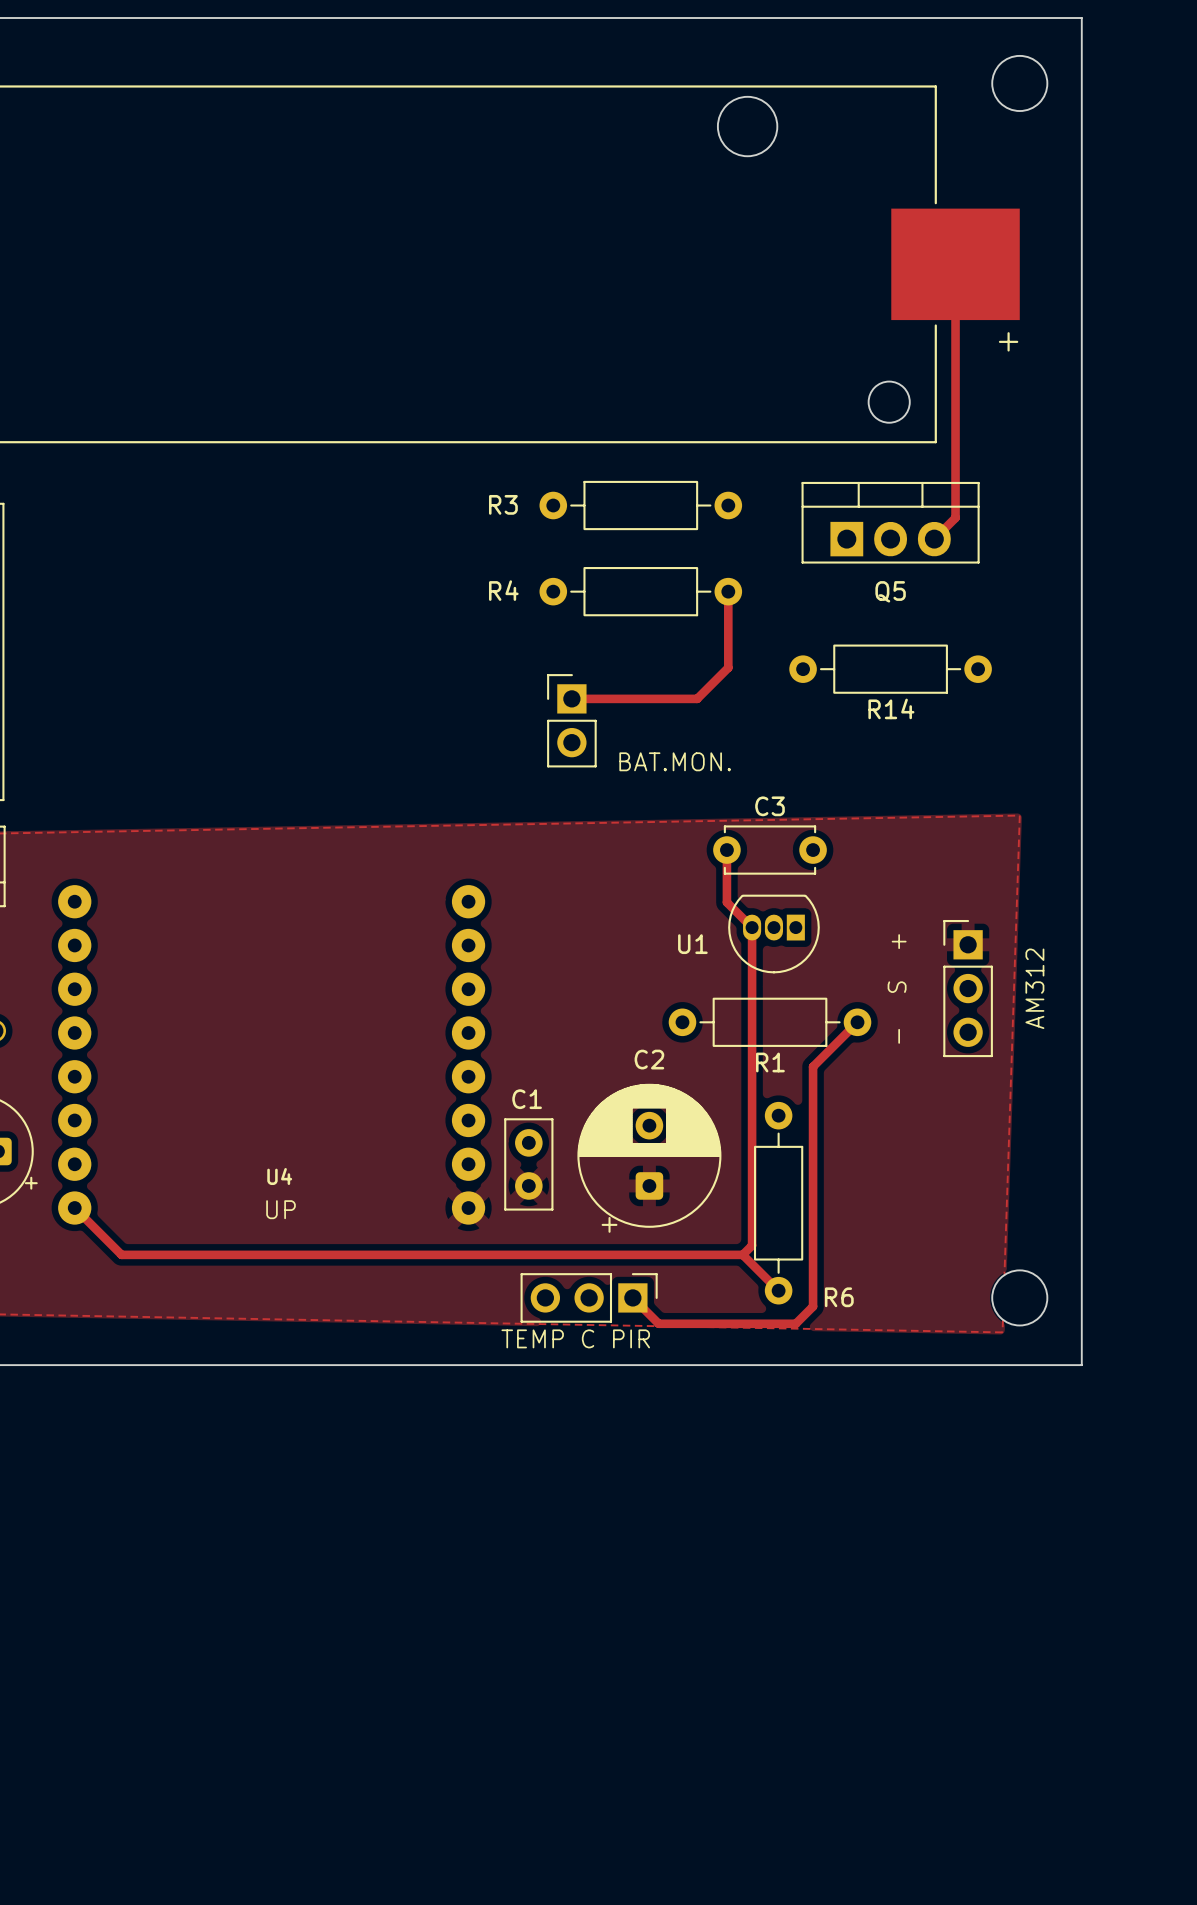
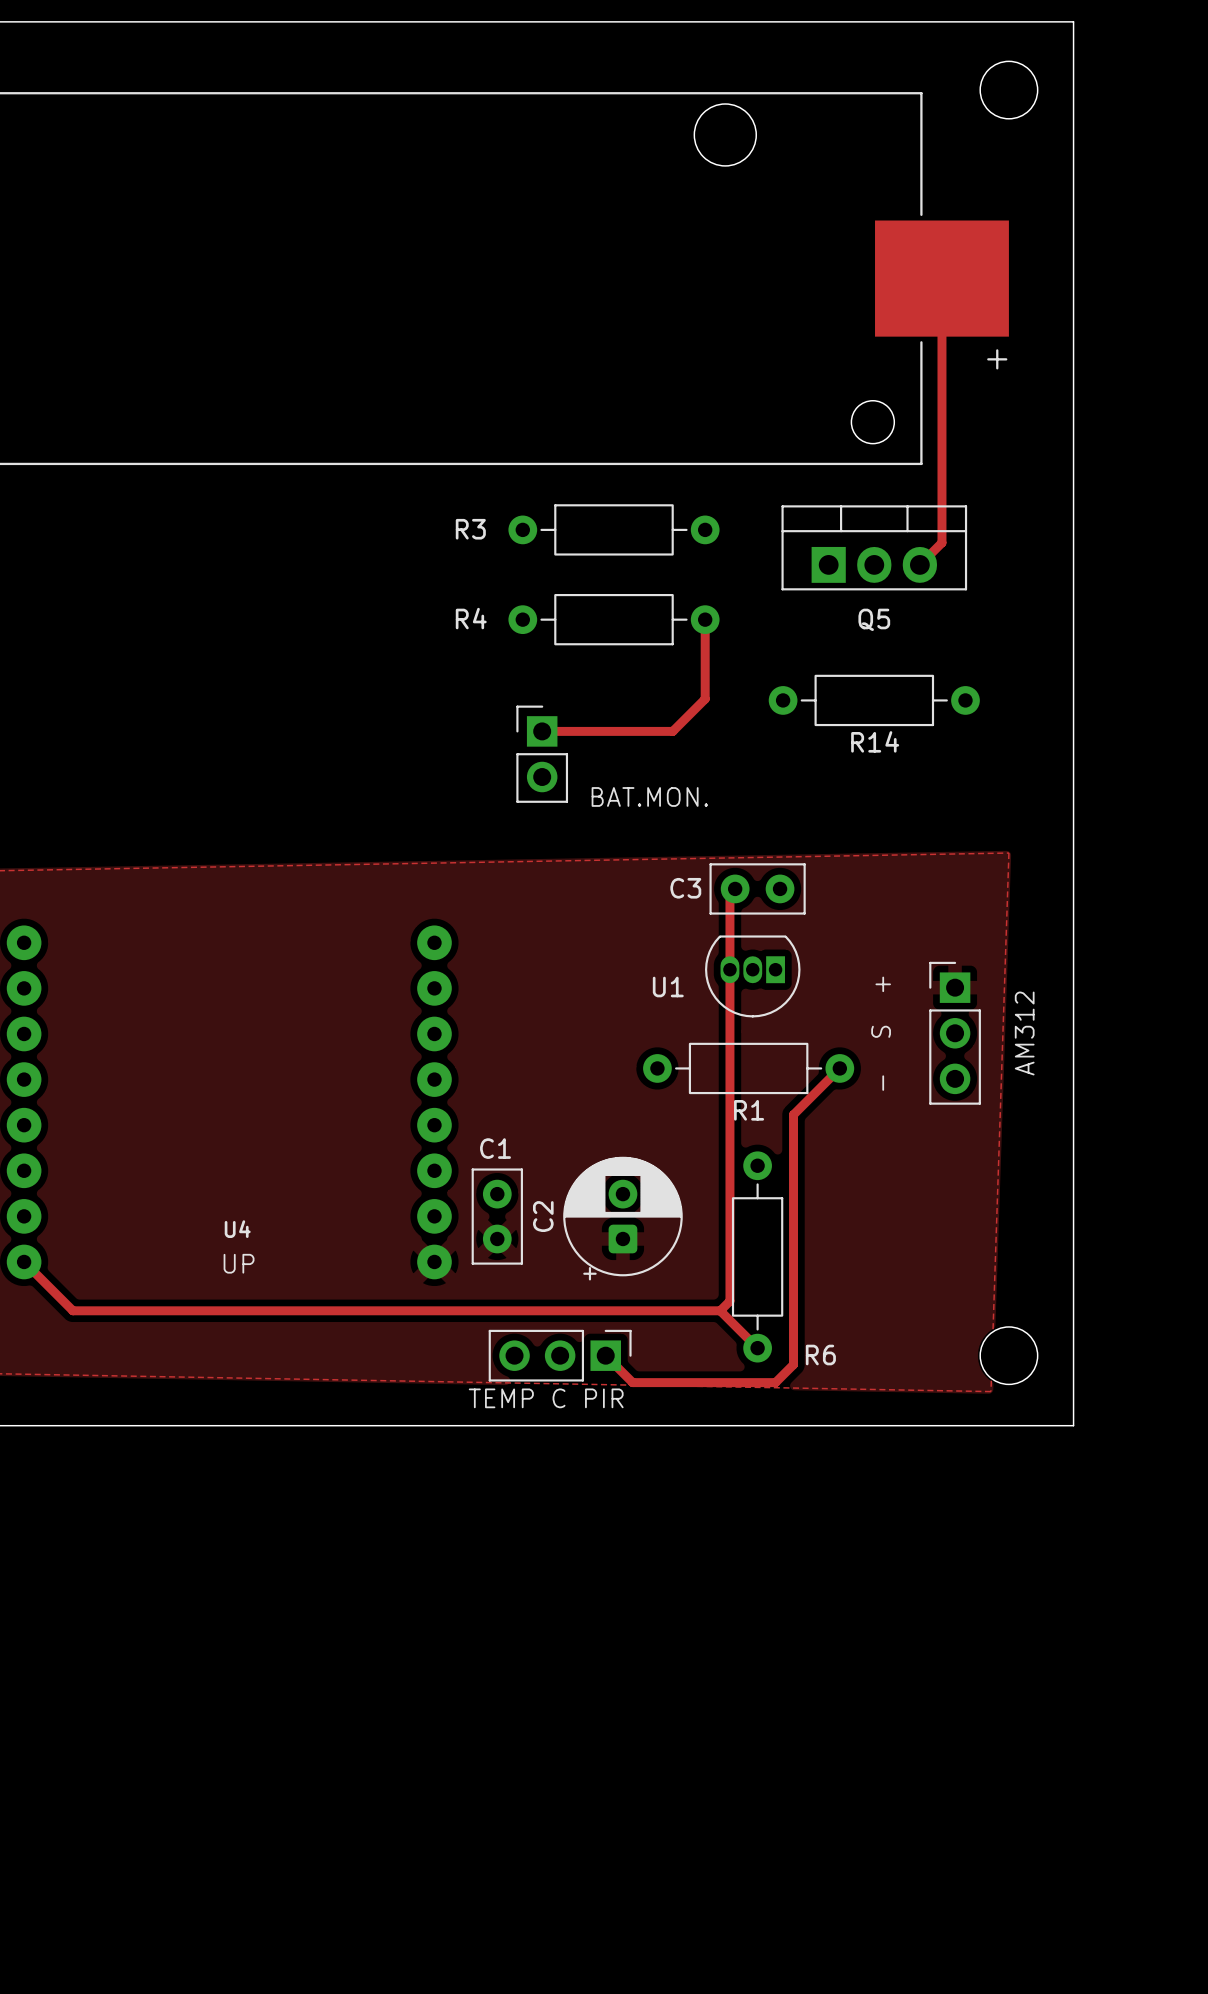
C3 name position: C3 (770, 806) -> C3 (685, 888)
C3 footprint: [713, 825, 827, 875] -> [709, 863, 806, 915]
track: (726, 850) (726, 902) (752, 927) -> (735, 888) (729, 894) (729, 969)
C2 name position: C2 (649, 1059) -> C2 (543, 1216)
C2 footprint: [577, 1083, 722, 1233] -> [563, 1156, 683, 1281]

